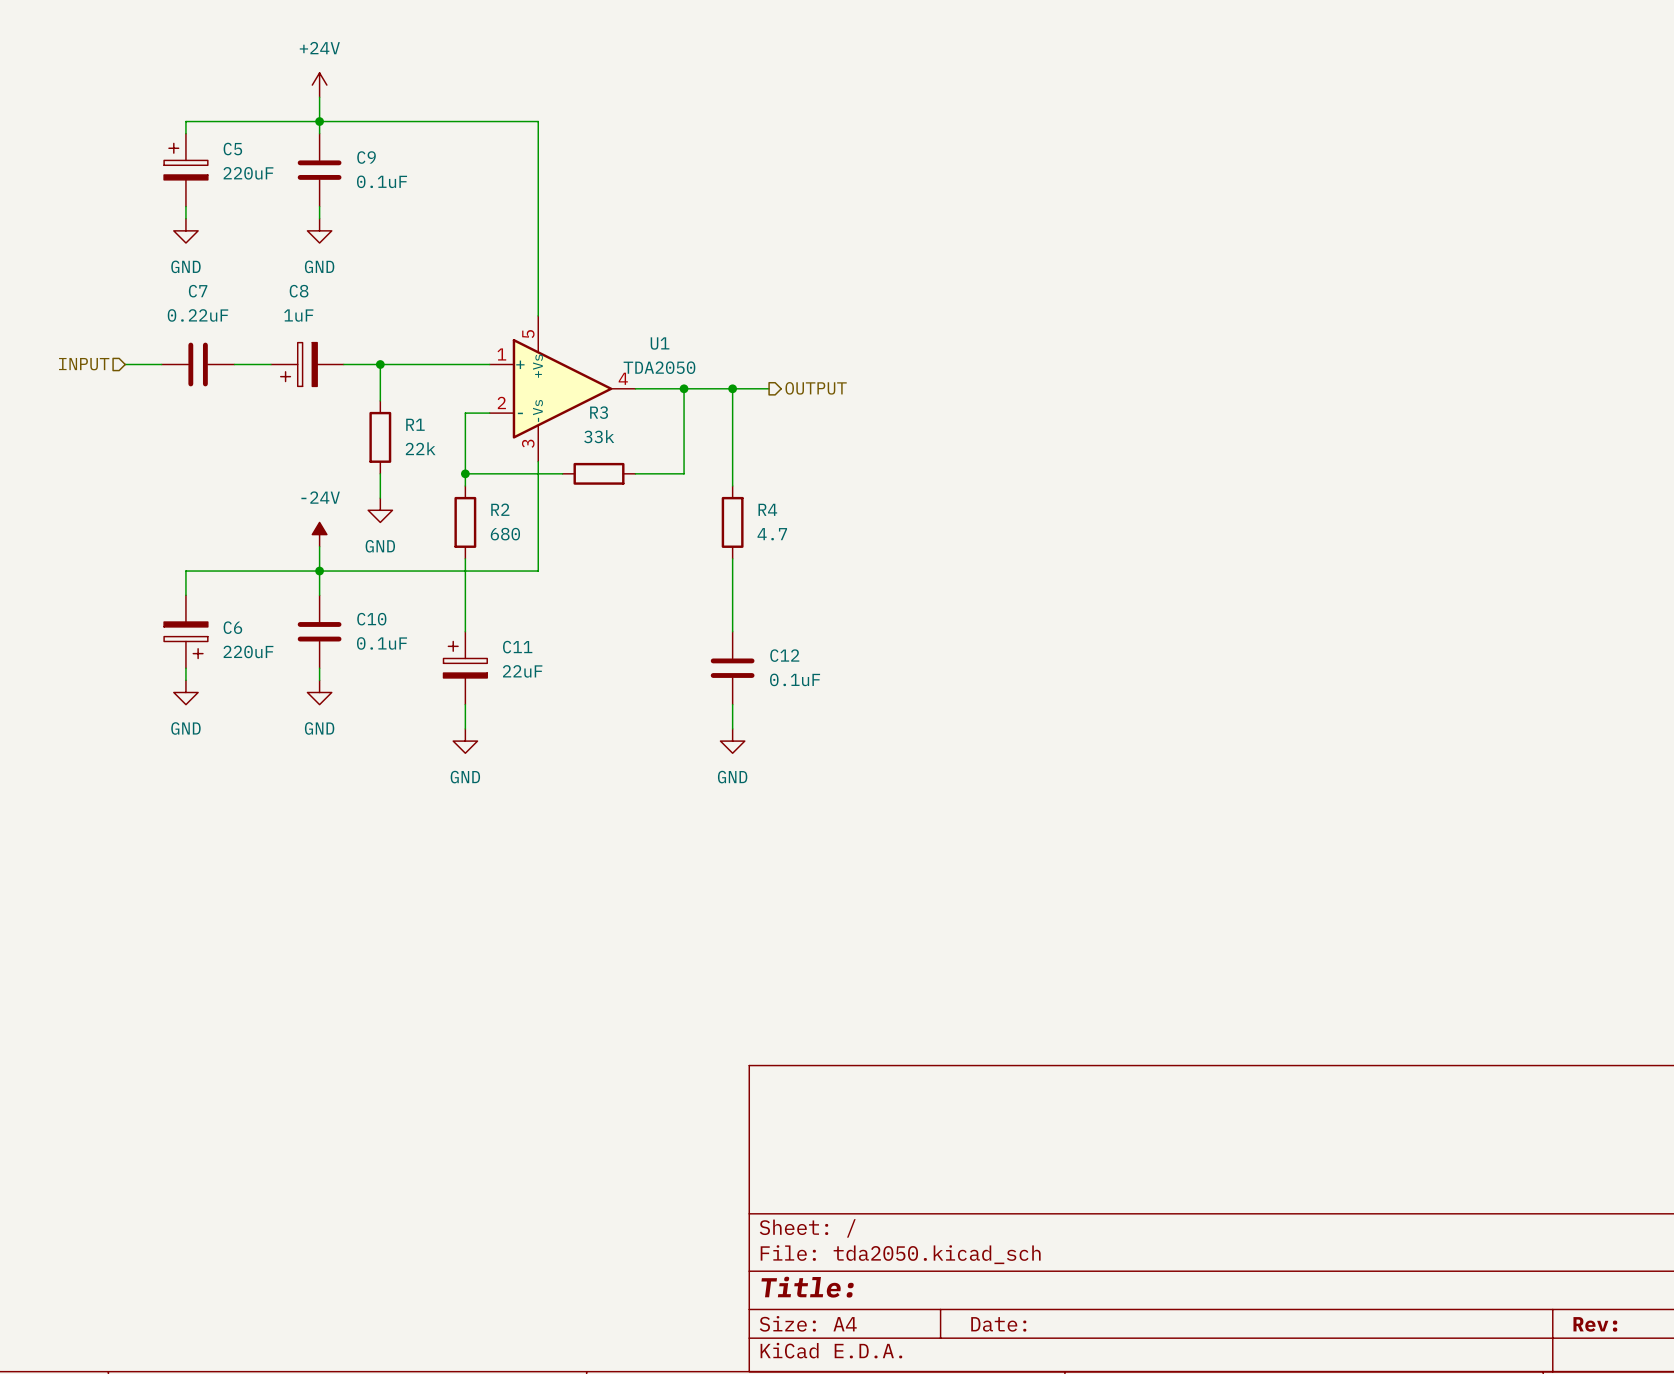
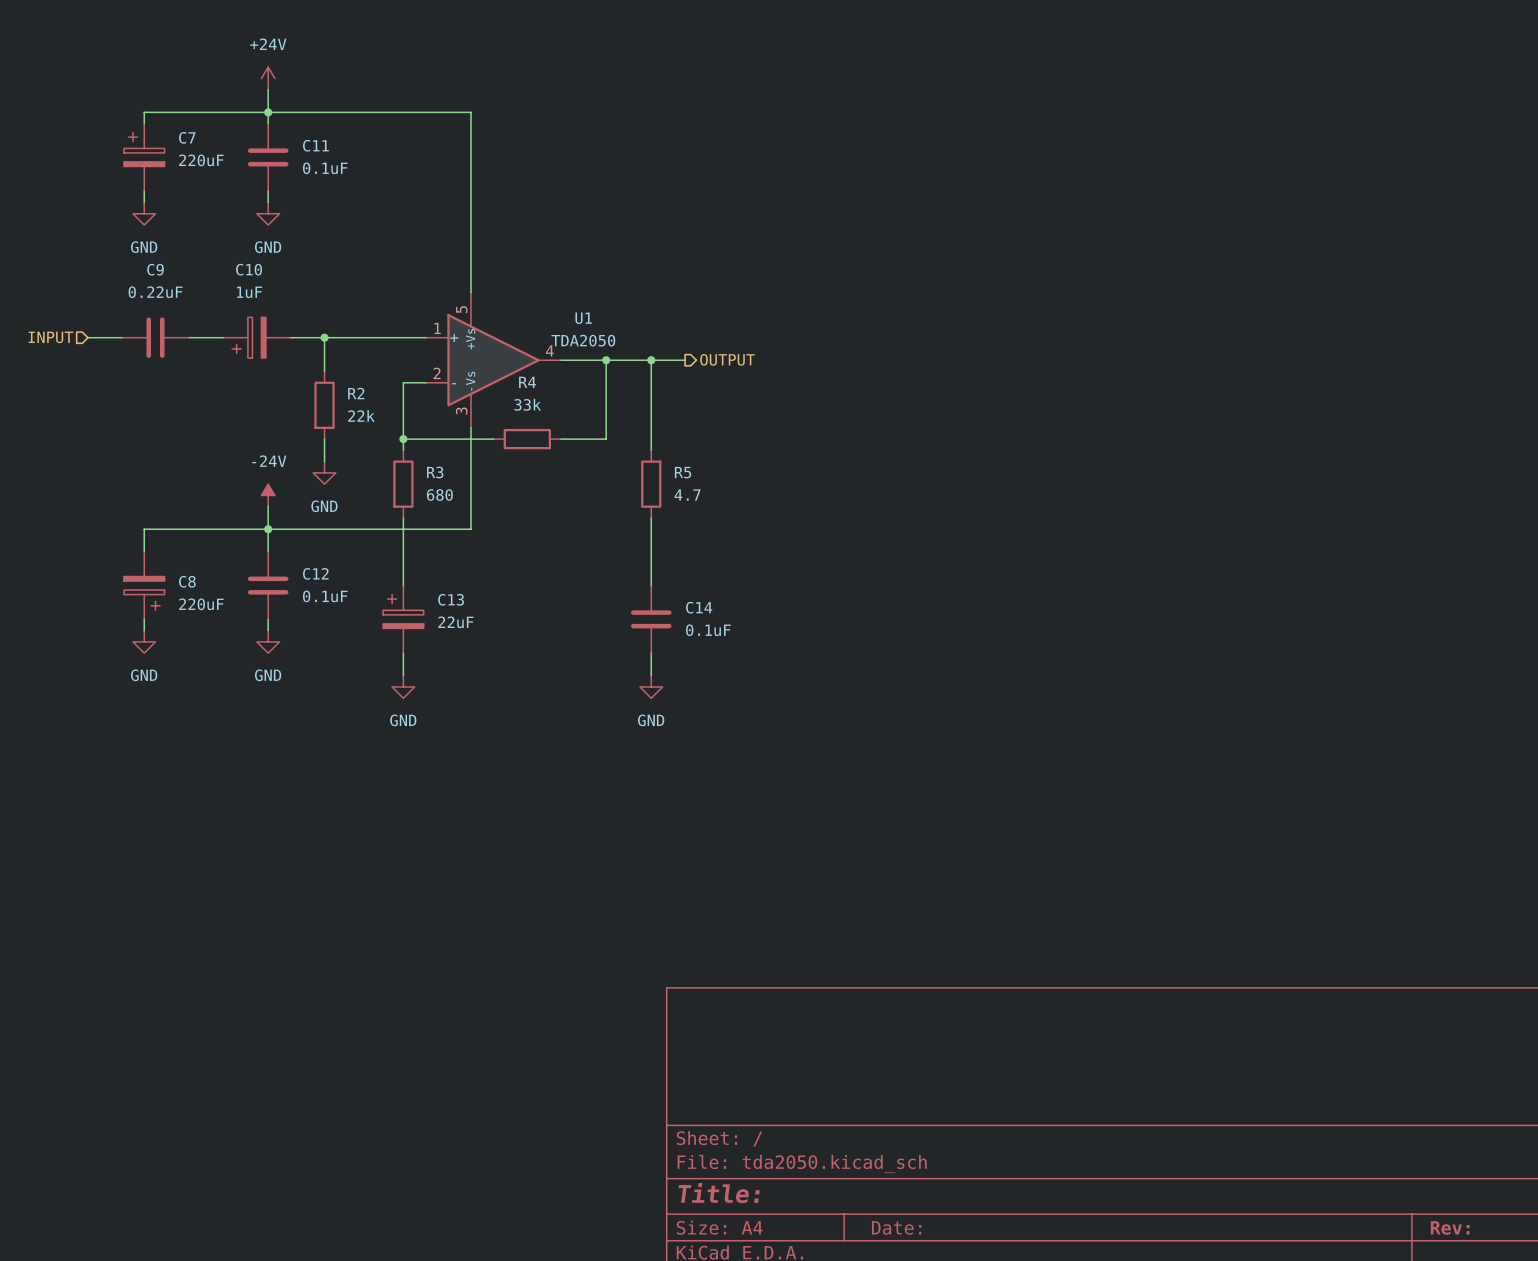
C5 name: C5 (232, 149) -> C7 (187, 137)
C9 name: C9 (366, 157) -> C11 (315, 145)
C7 name: C7 (198, 291) -> C9 (155, 269)
C8 name: C8 (299, 291) -> C10 (249, 269)
R3 name: R3 (599, 412) -> R4 (527, 382)
R1 name: R1 (415, 424) -> R2 (356, 393)
R2 name: R2 (500, 509) -> R3 (435, 472)
R4 name: R4 (767, 509) -> R5 (683, 472)
C10 name: C10 (371, 619) -> C12 (315, 573)
C6 name: C6 (232, 627) -> C8 (187, 581)
C11 name: C11 (517, 647) -> C13 (451, 599)
C12 name: C12 (784, 655) -> C14 (699, 607)

